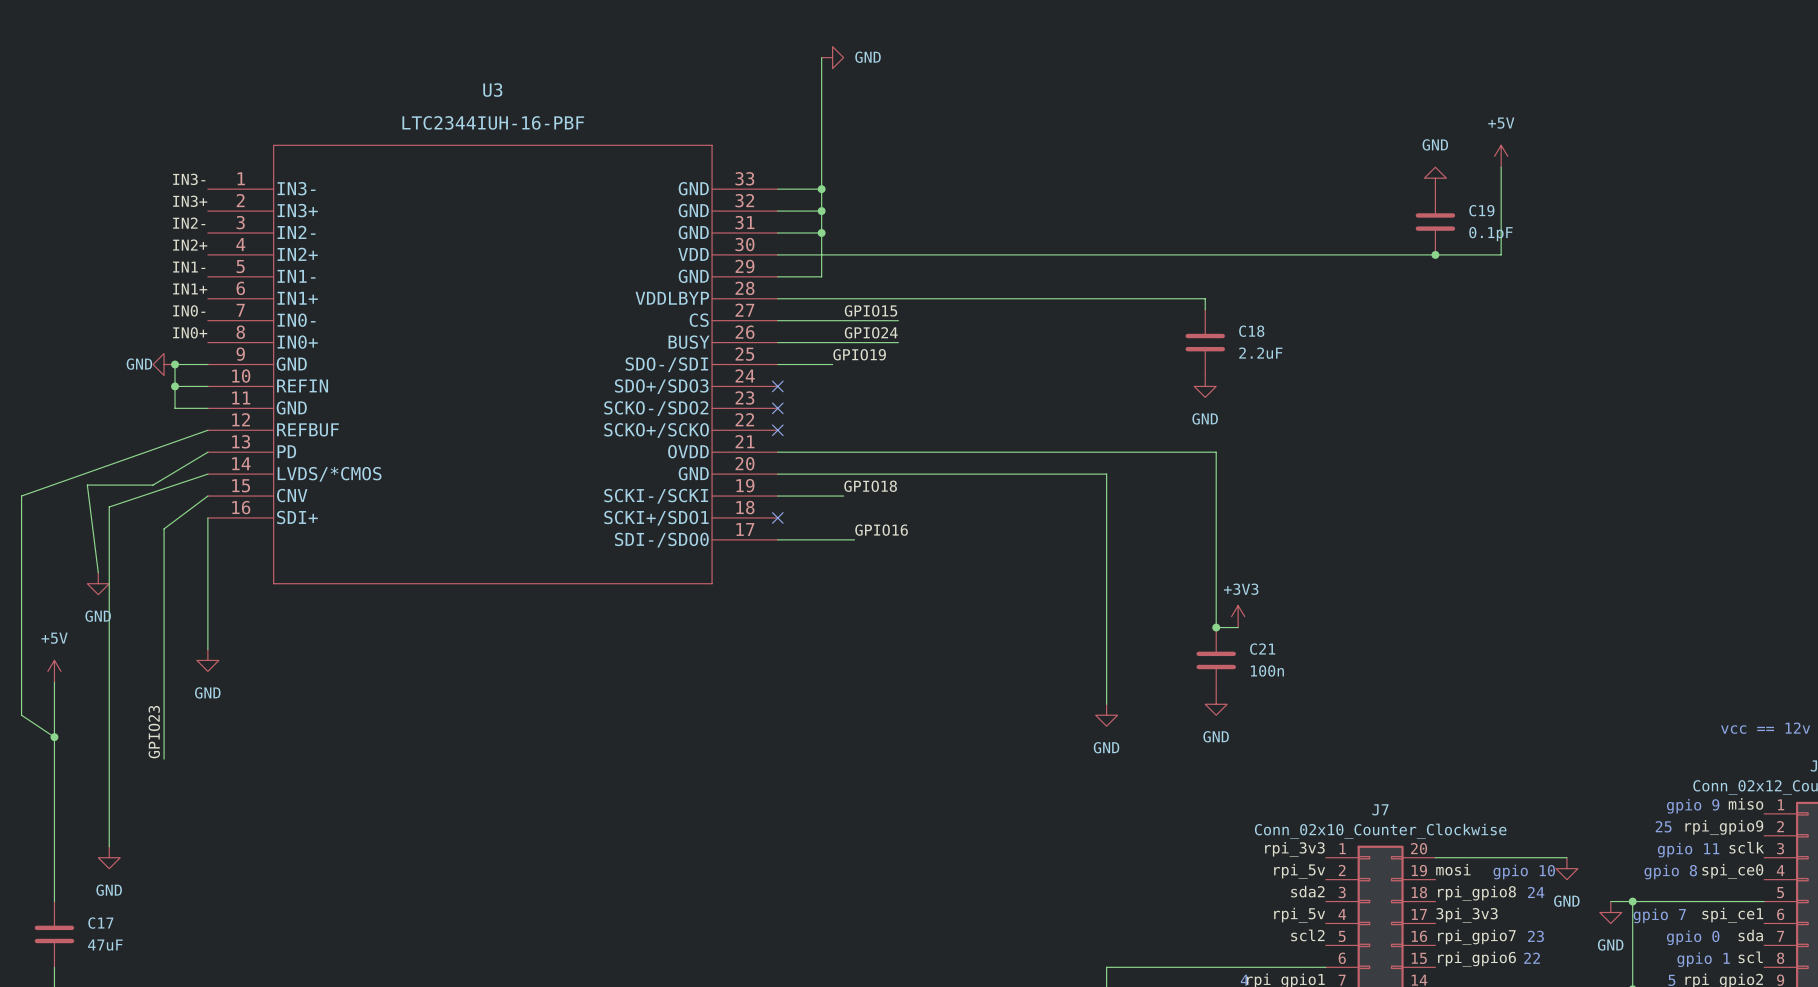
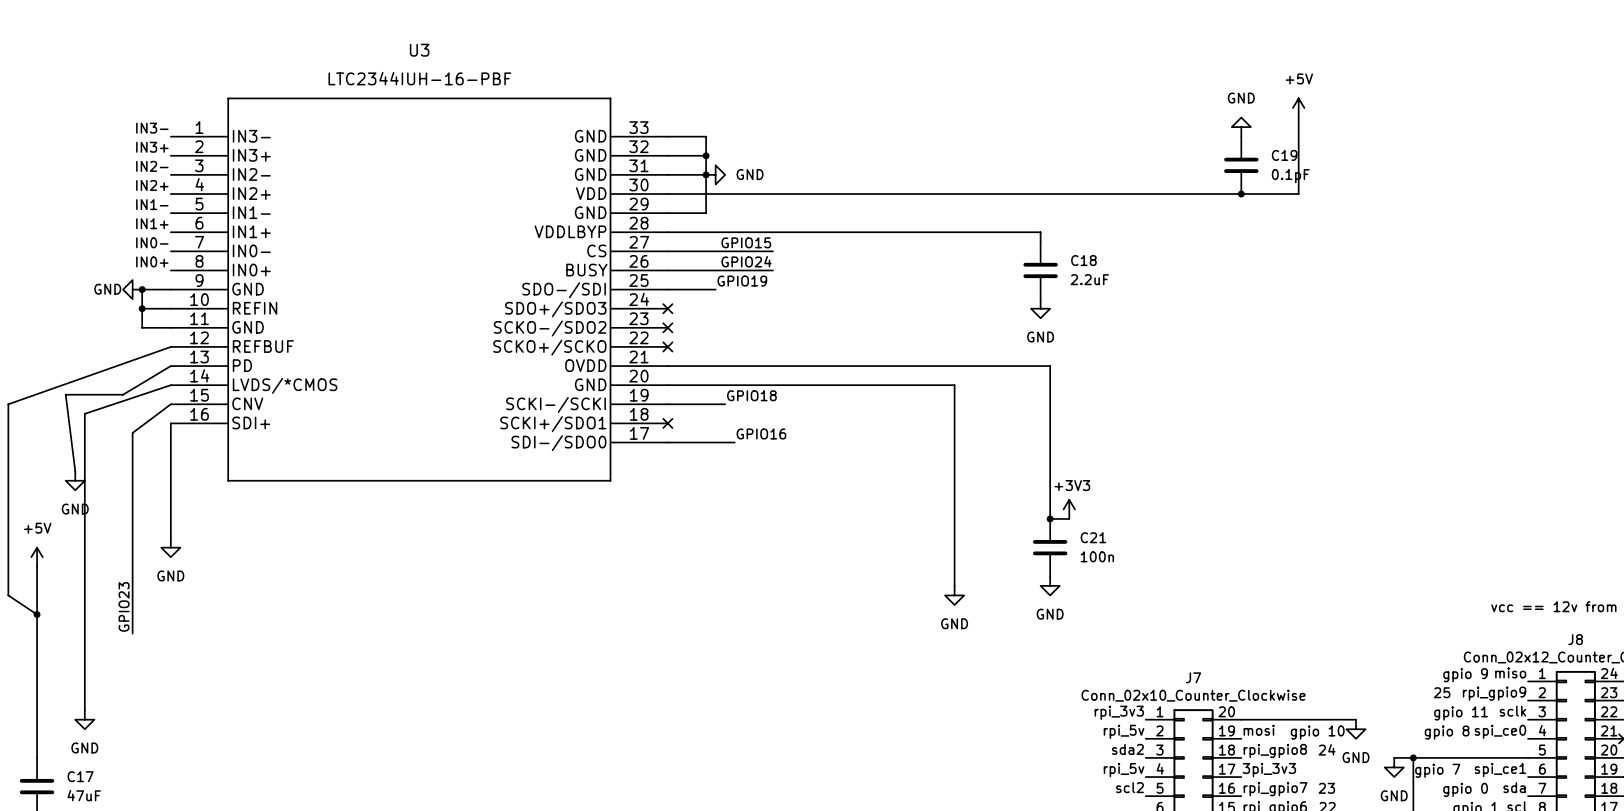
wire: (821, 57) (821, 189) -> none
power symbol position: GND (832, 57) -> GND (715, 174)
junction: (821, 189) -> none

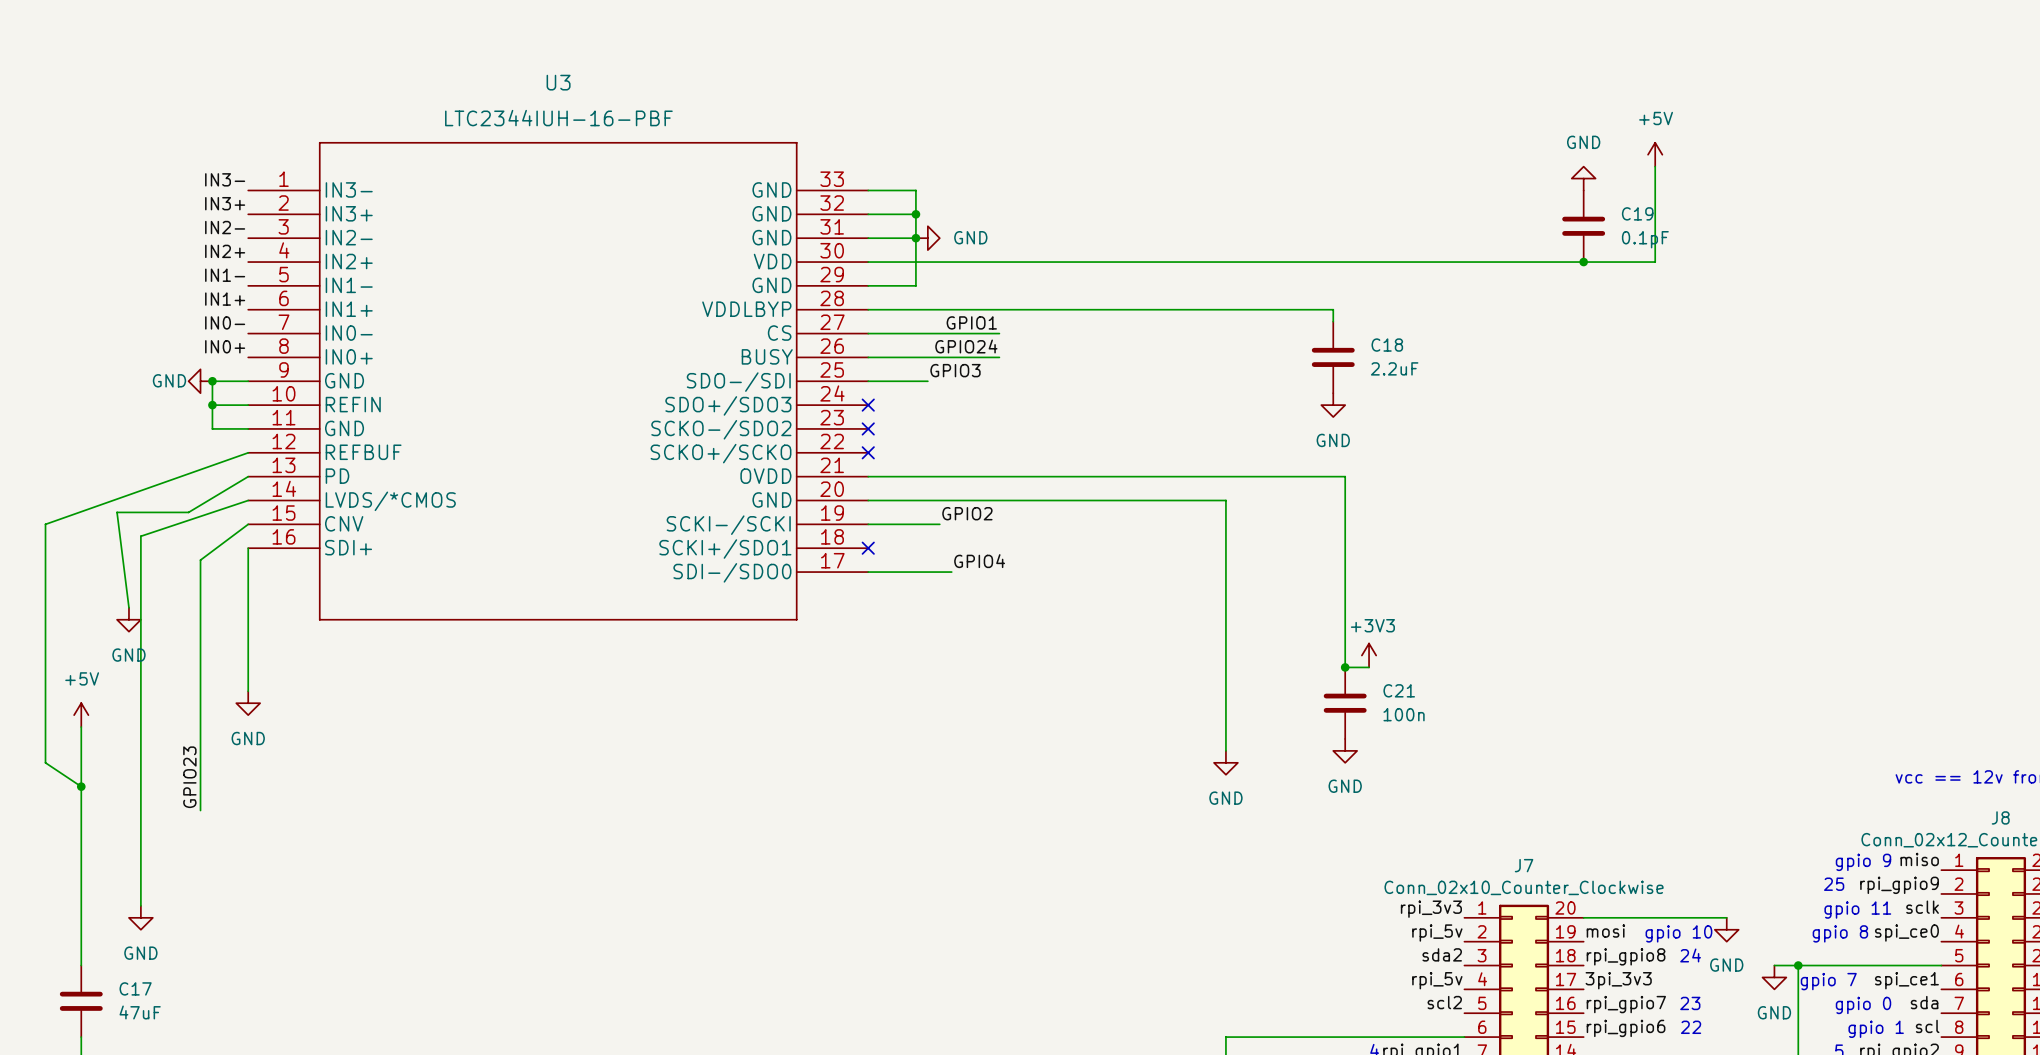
label: GPIO15 (746, 242) -> GPIO1 (971, 322)
label: GPIO19 (742, 281) -> GPIO3 (955, 370)
label: GPIO18 (751, 395) -> GPIO2 (967, 513)
label: GPIO16 (761, 433) -> GPIO4 (979, 561)

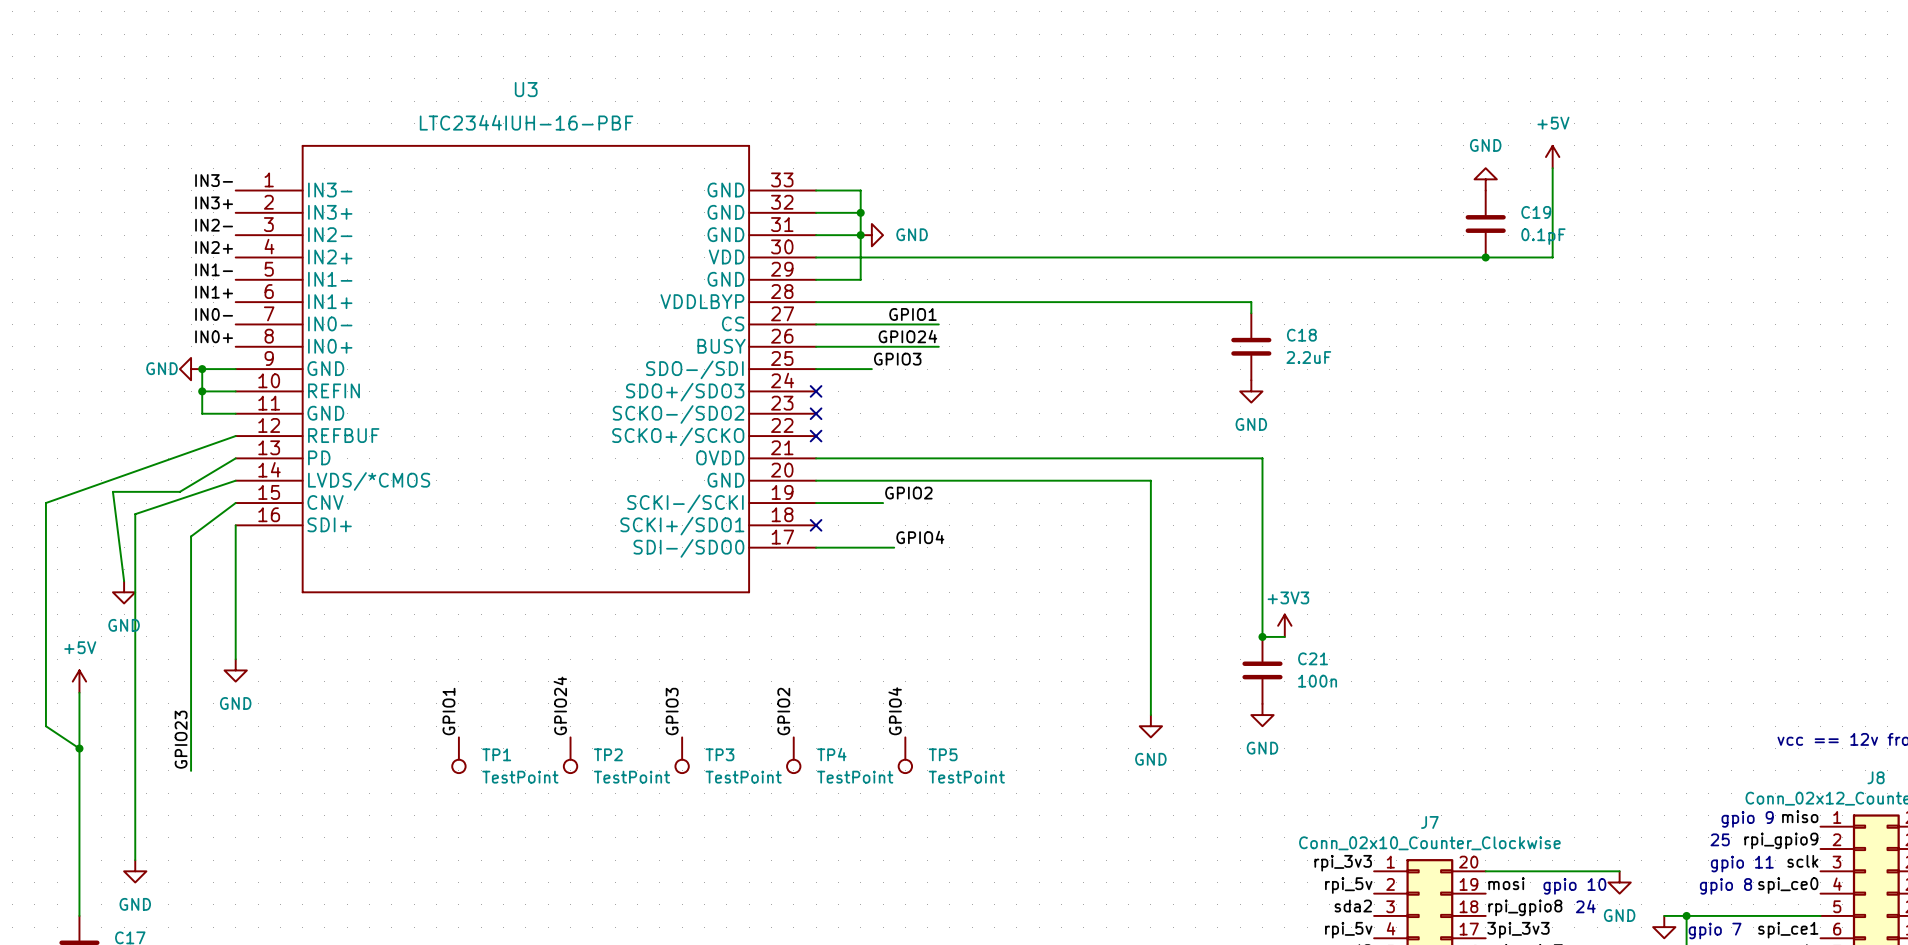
label: none -> GPIO24 (560, 705)
label: none -> GPIO4 (895, 711)
label: none -> GPIO1 (448, 711)
label: none -> GPIO3 (672, 711)
label: none -> GPIO2 (783, 711)
TP1: none -> TestPoint (458, 755)
TP2: none -> TestPoint (570, 755)
TP3: none -> TestPoint (682, 755)
TP4: none -> TestPoint (793, 755)
TP5: none -> TestPoint (905, 755)

